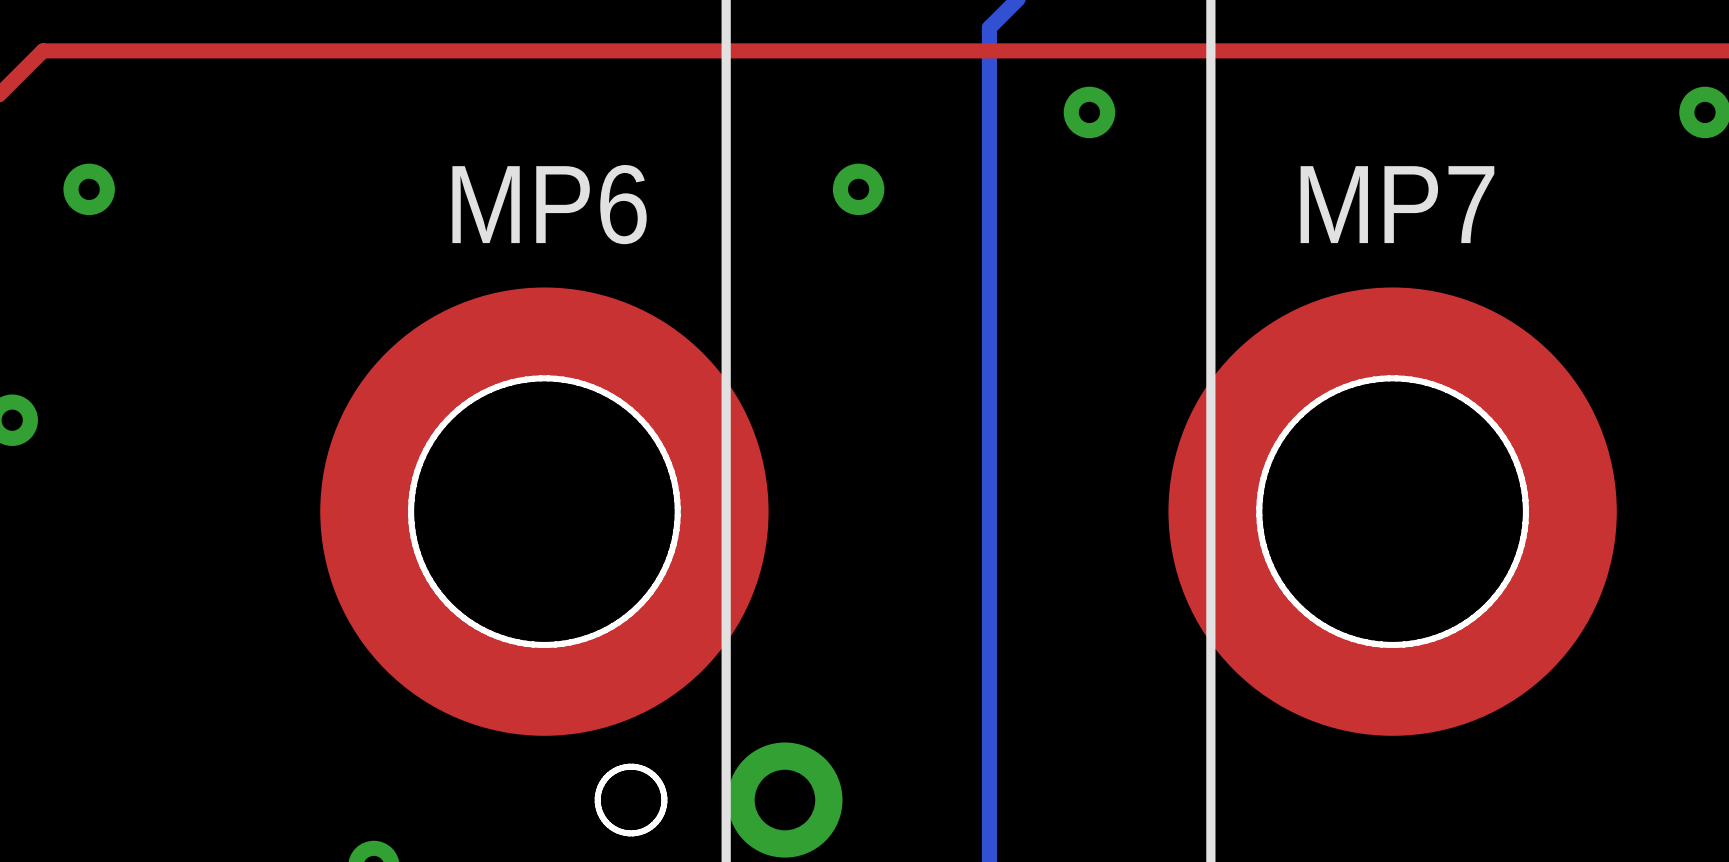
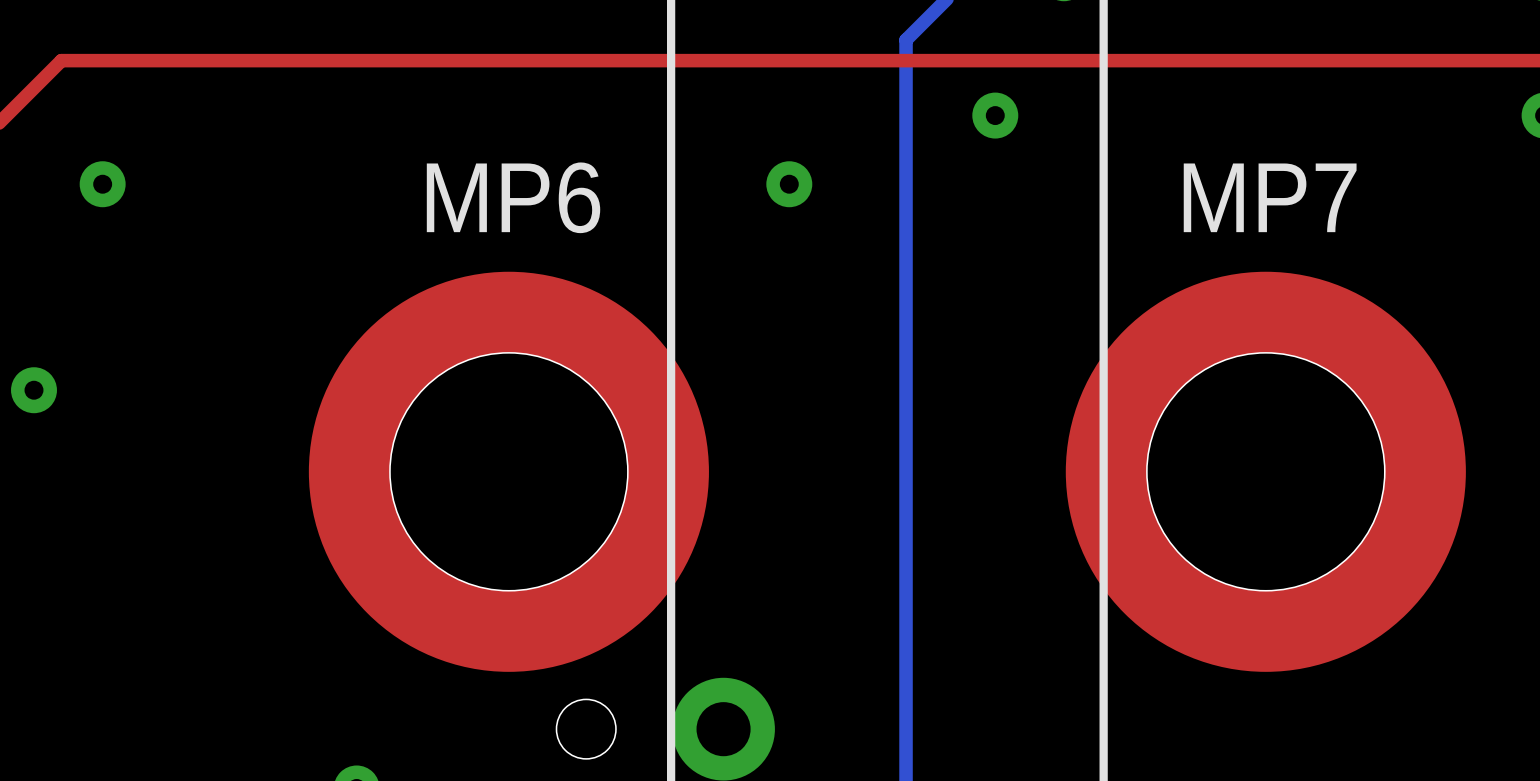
board edge: (540, 378) (518, 380) (489, 389) (470, 400) (447, 420) (433, 437) (419, 464) (412, 493) (411, 515) (413, 537) (422, 566) (433, 585) (452, 608) (470, 622) (496, 636) (525, 643) (548, 644) (570, 642) (598, 633) (618, 622) (641, 603) (655, 585) (668, 559) (676, 530) (677, 507) (675, 485) (666, 457) (655, 437) (636, 414) (618, 400) (591, 387) (563, 379) (540, 378) -> none
board edge: (1388, 378) (1411, 379) (1440, 387) (1466, 400) (1484, 414) (1503, 437) (1514, 457) (1523, 485) (1525, 507) (1524, 530) (1517, 559) (1503, 585) (1489, 603) (1466, 622) (1447, 633) (1418, 642) (1396, 644) (1373, 643) (1345, 636) (1318, 622) (1301, 608) (1281, 585) (1270, 566) (1261, 537) (1259, 515) (1260, 493) (1268, 464) (1281, 437) (1295, 420) (1318, 400) (1338, 389) (1366, 380) (1388, 378) -> none
hole: (544, 511) -> none
hole: (1392, 511) -> none
board edge: (629, 766) (640, 767) (653, 775) (660, 783) (664, 798) (661, 812) (655, 822) (647, 829) (632, 833) (618, 830) (608, 824) (601, 816) (597, 801) (598, 790) (606, 777) (614, 770) (629, 766) -> none

